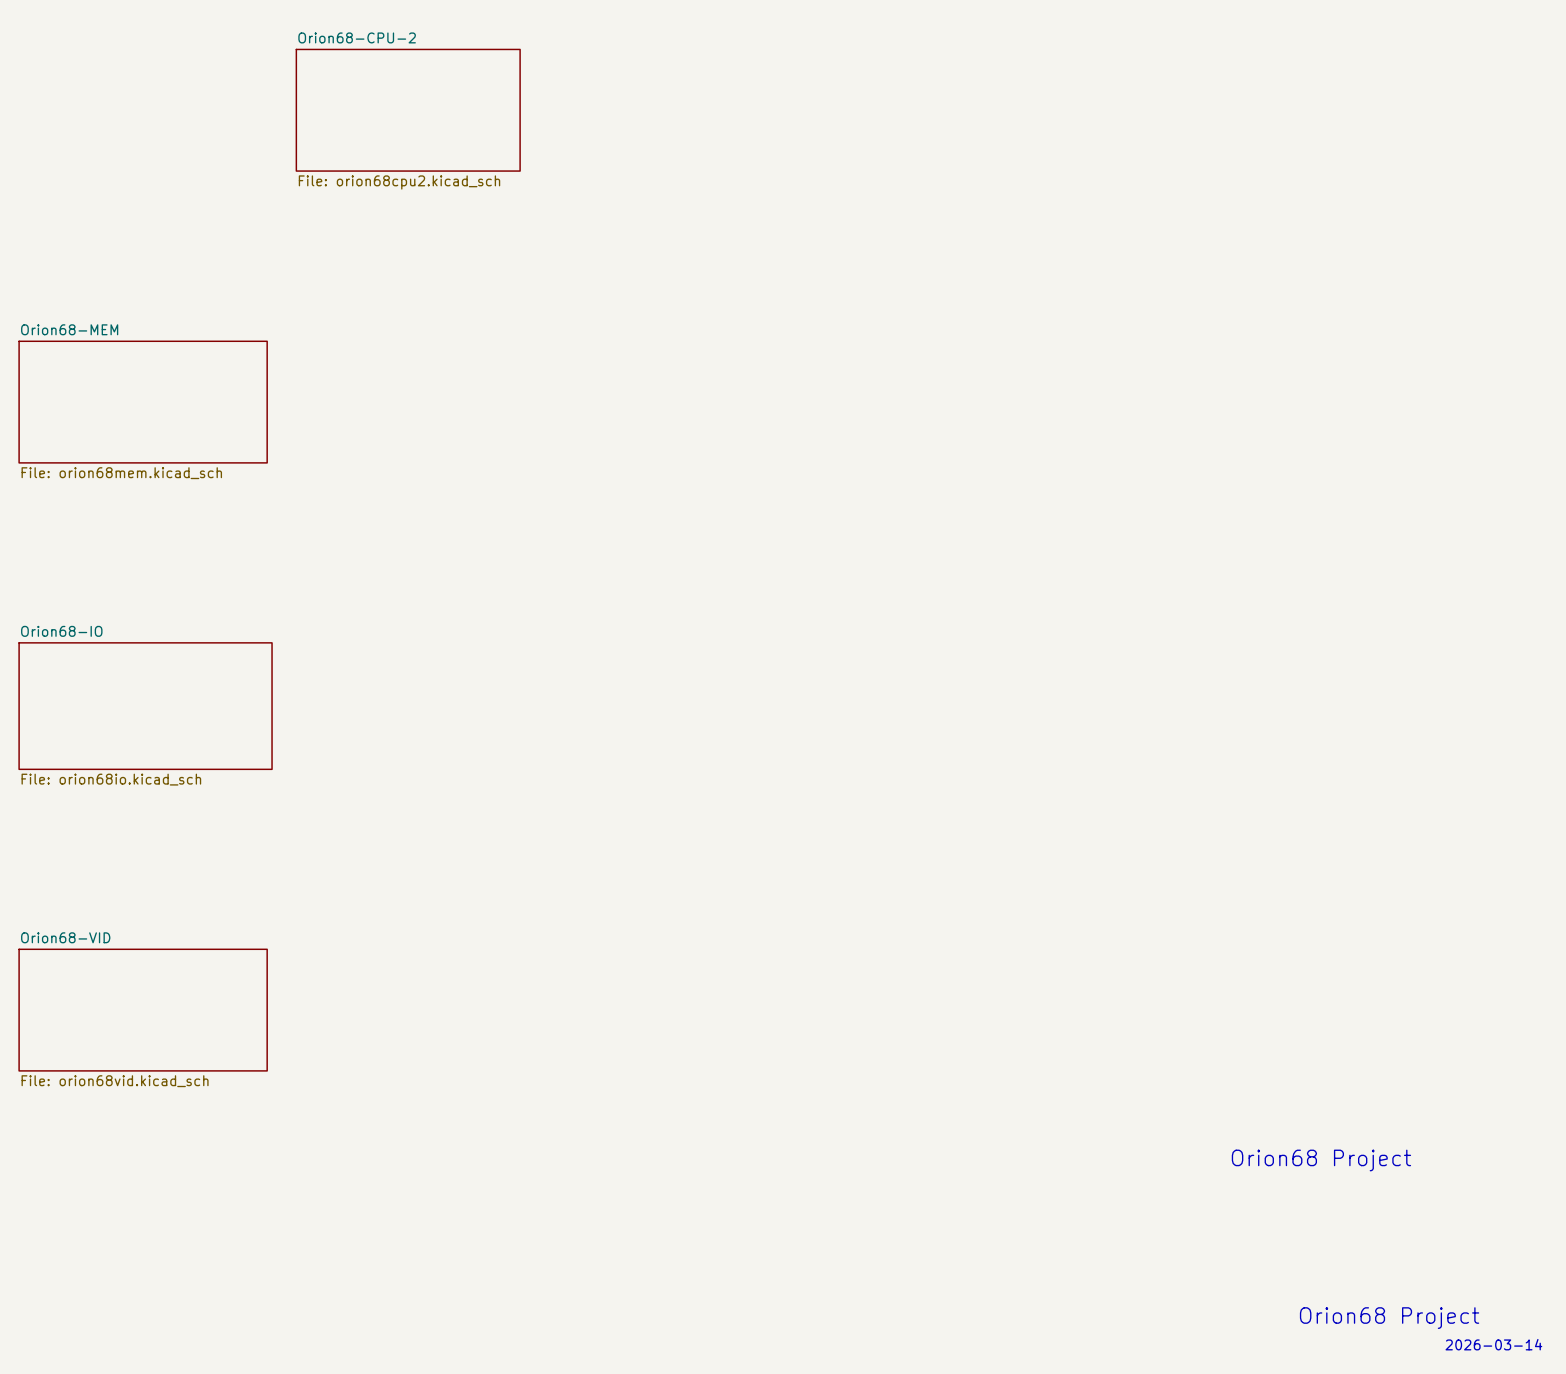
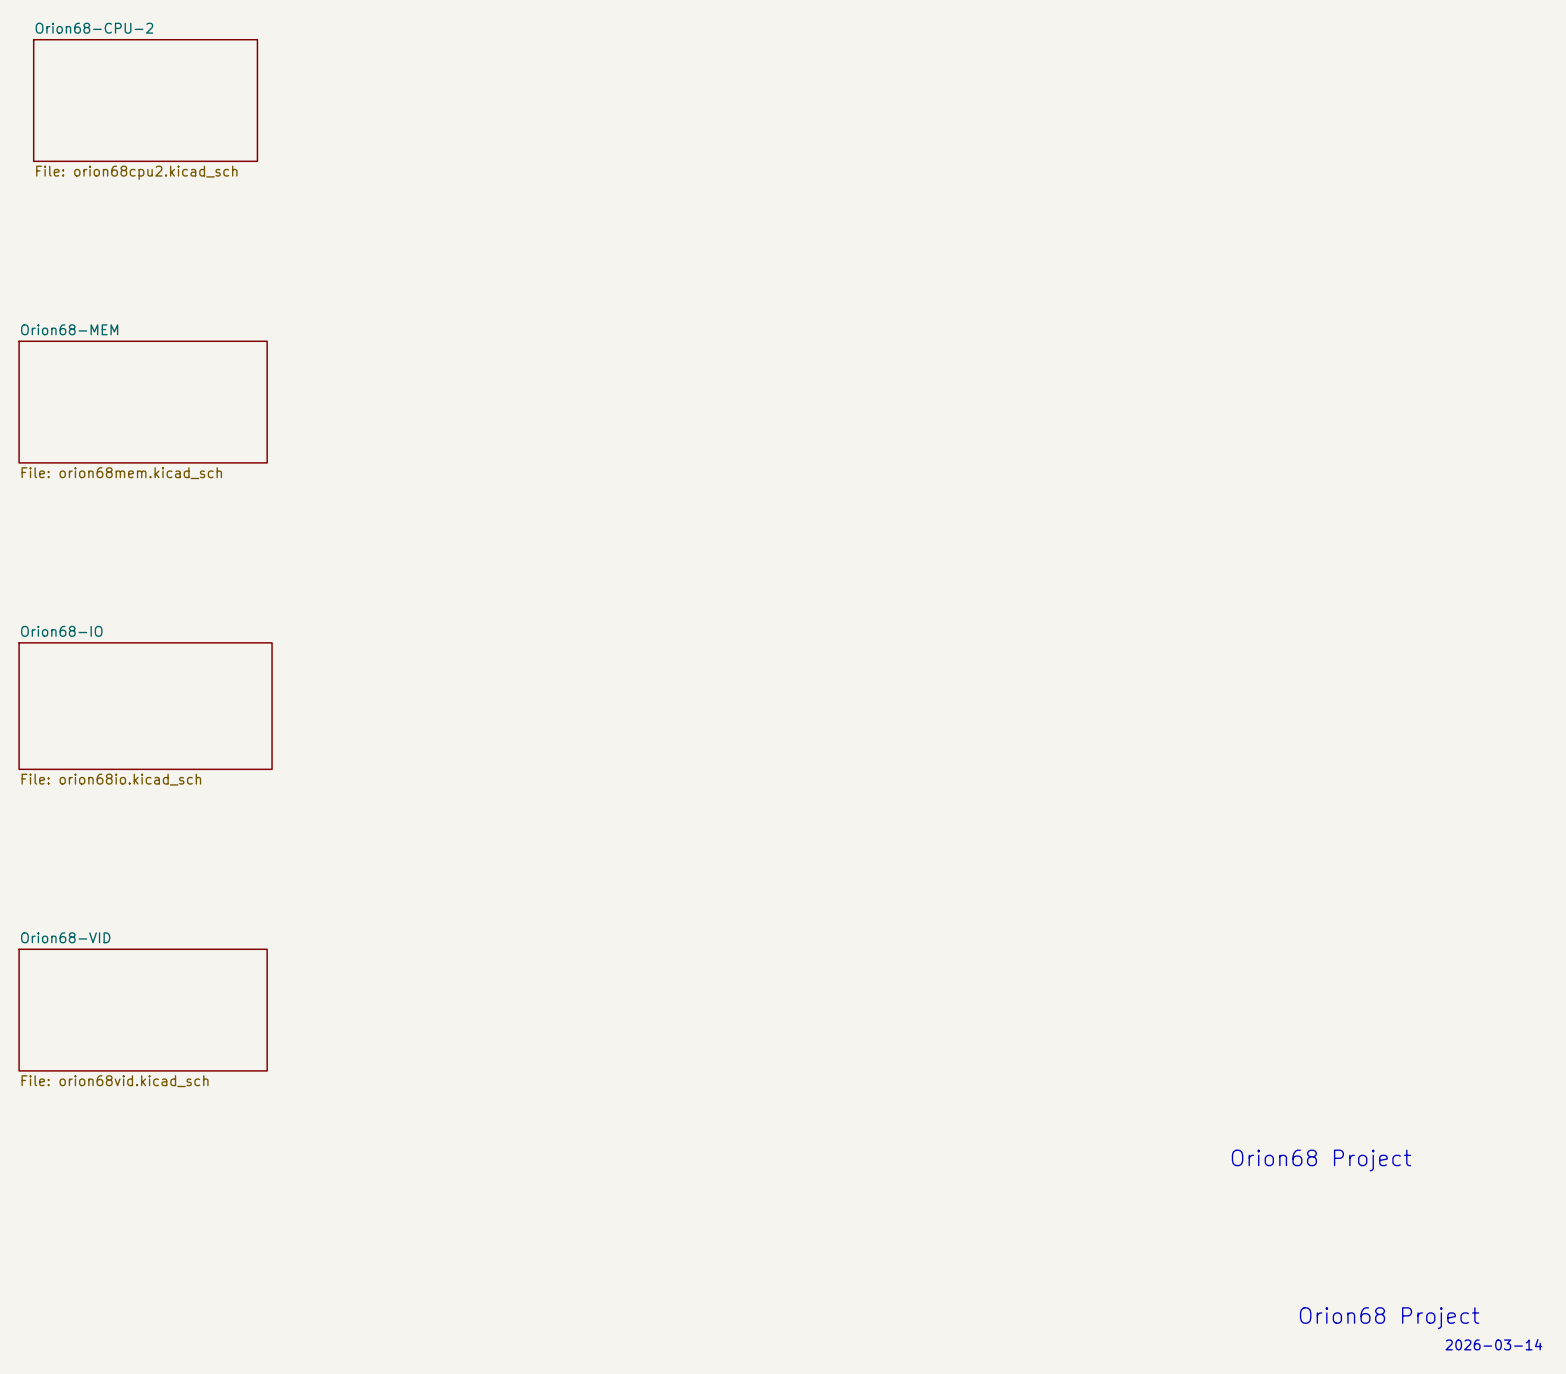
sheet Orion68-CPU-2 position: (408, 110) -> (145, 100)

